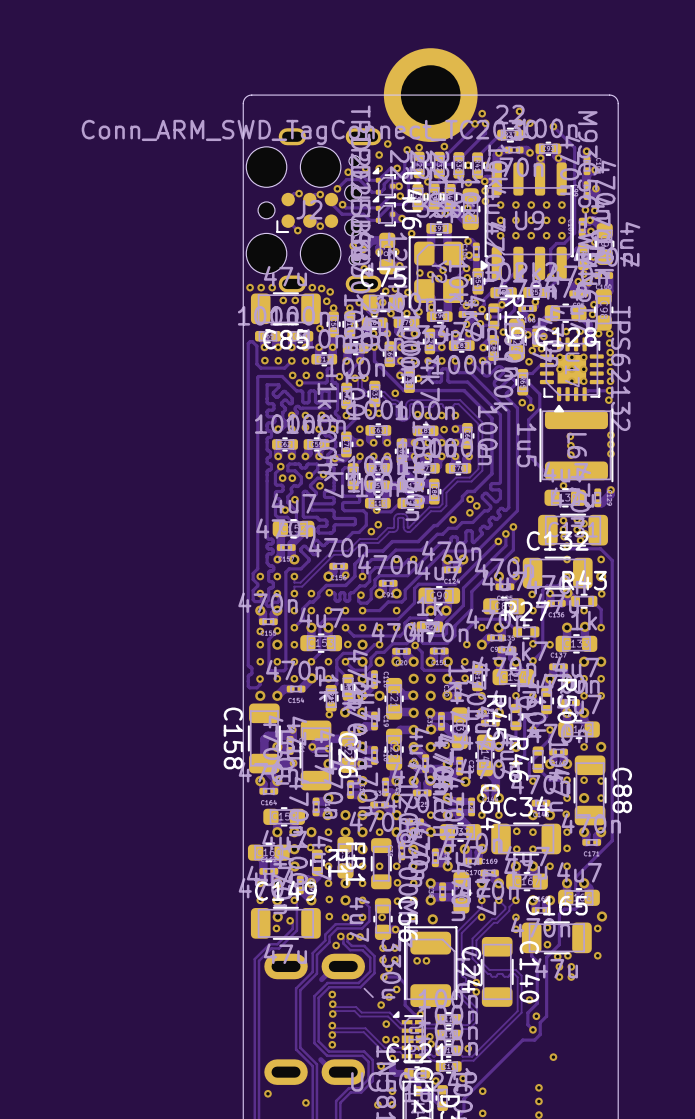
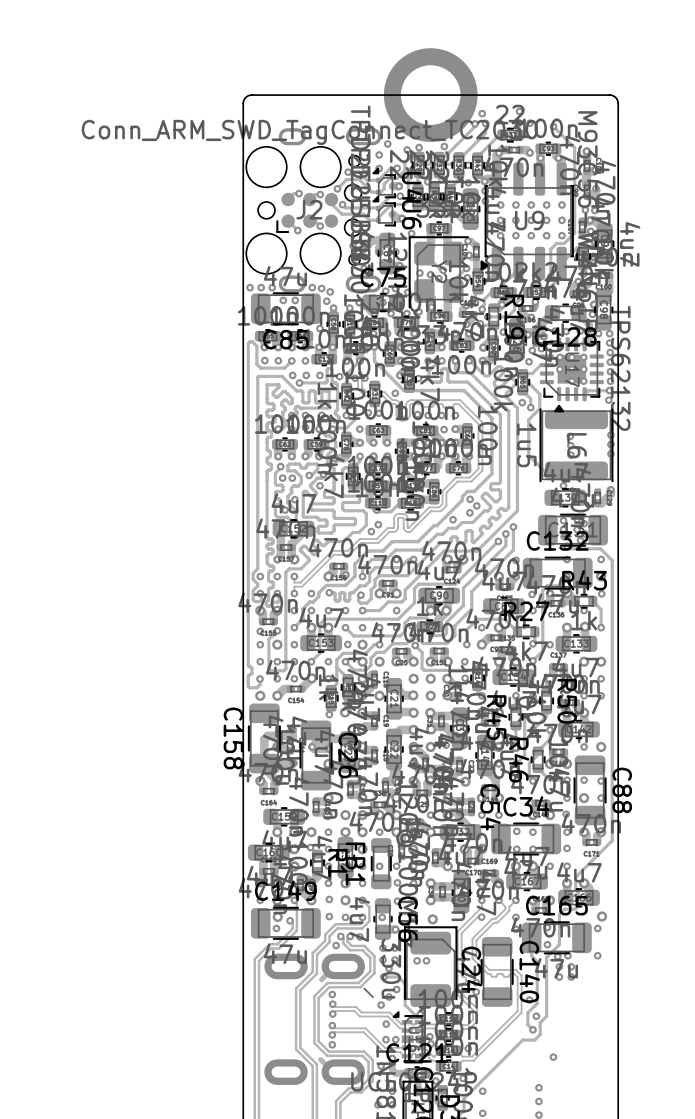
via: (267, 1093) -> none
via: (305, 1102) -> none

